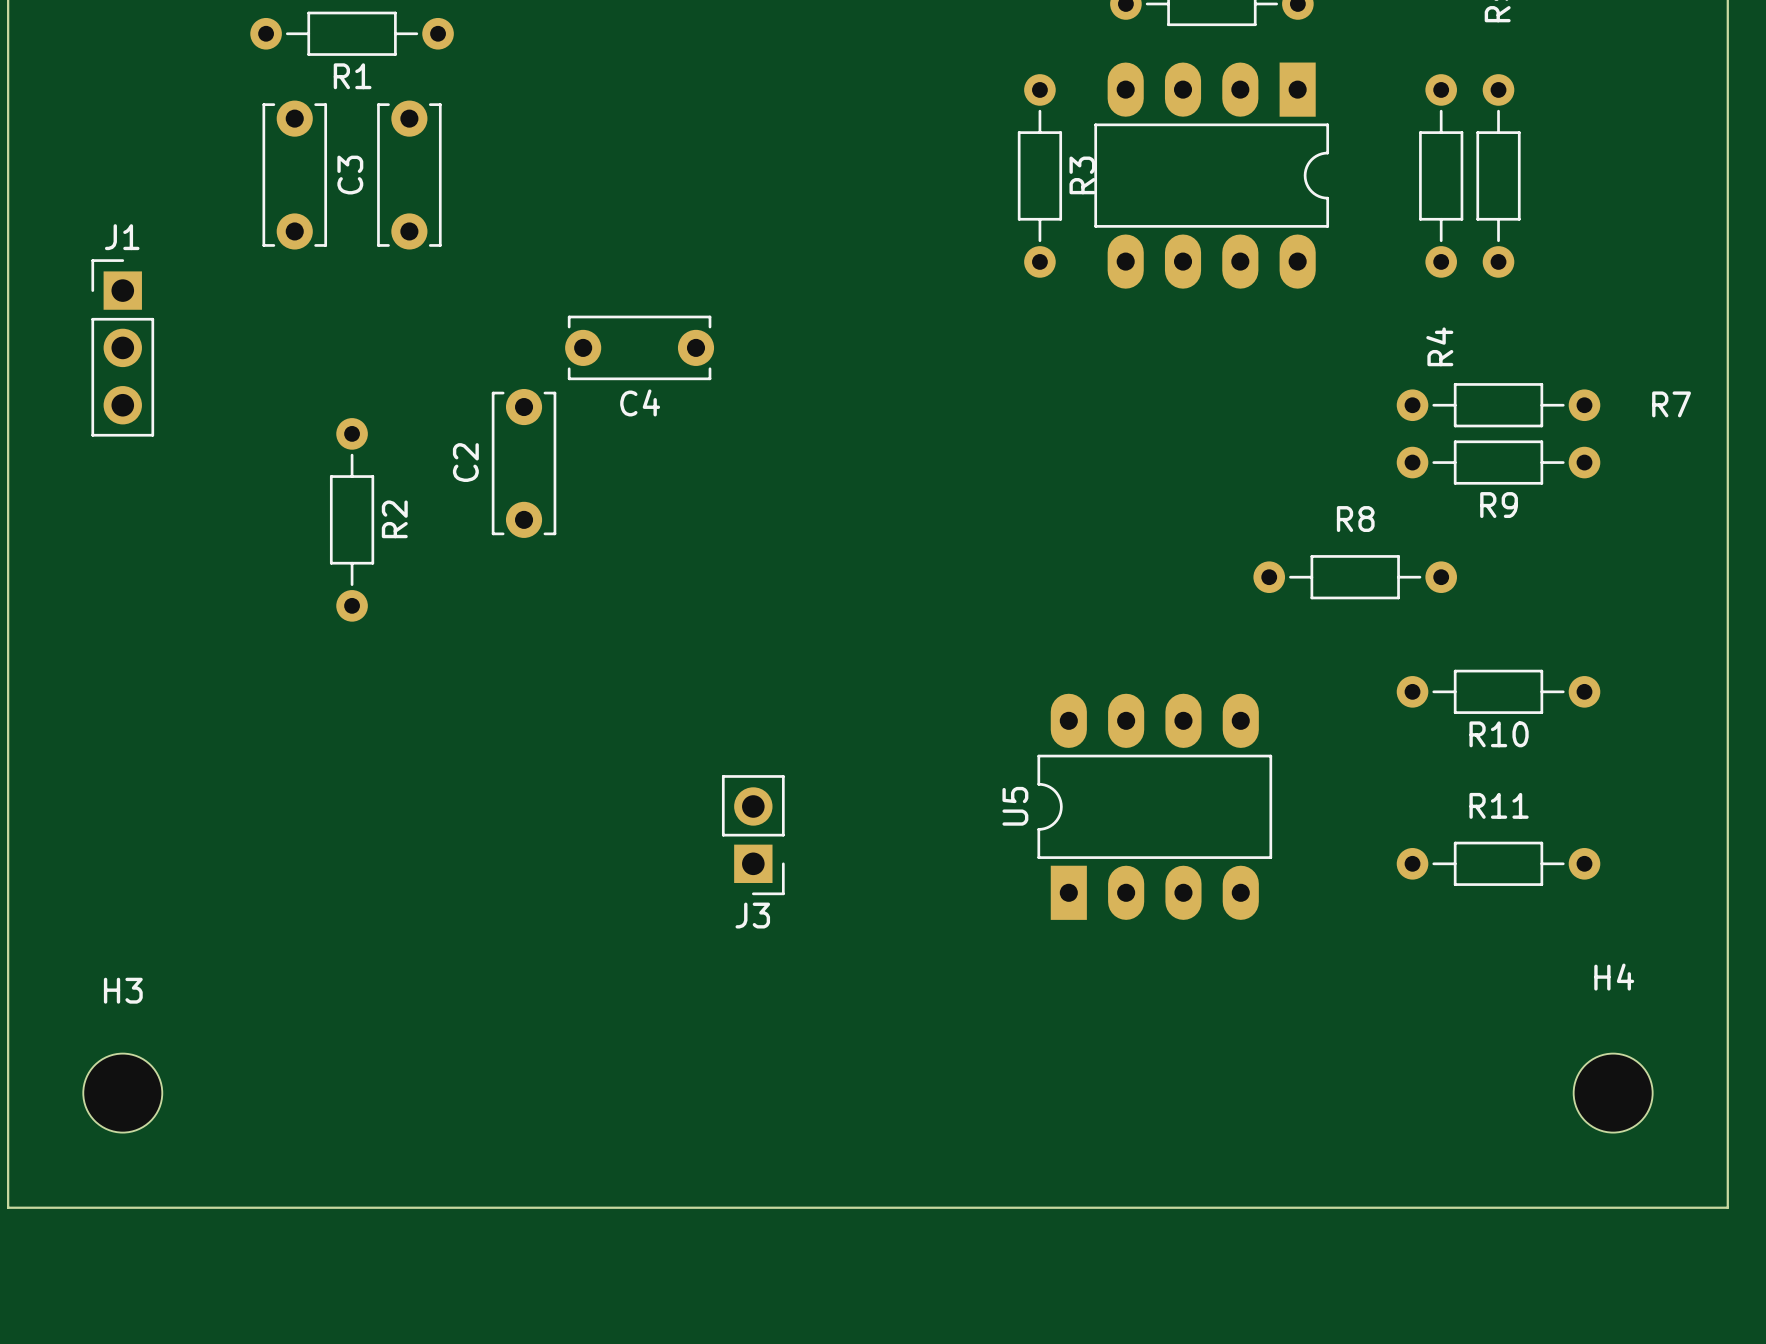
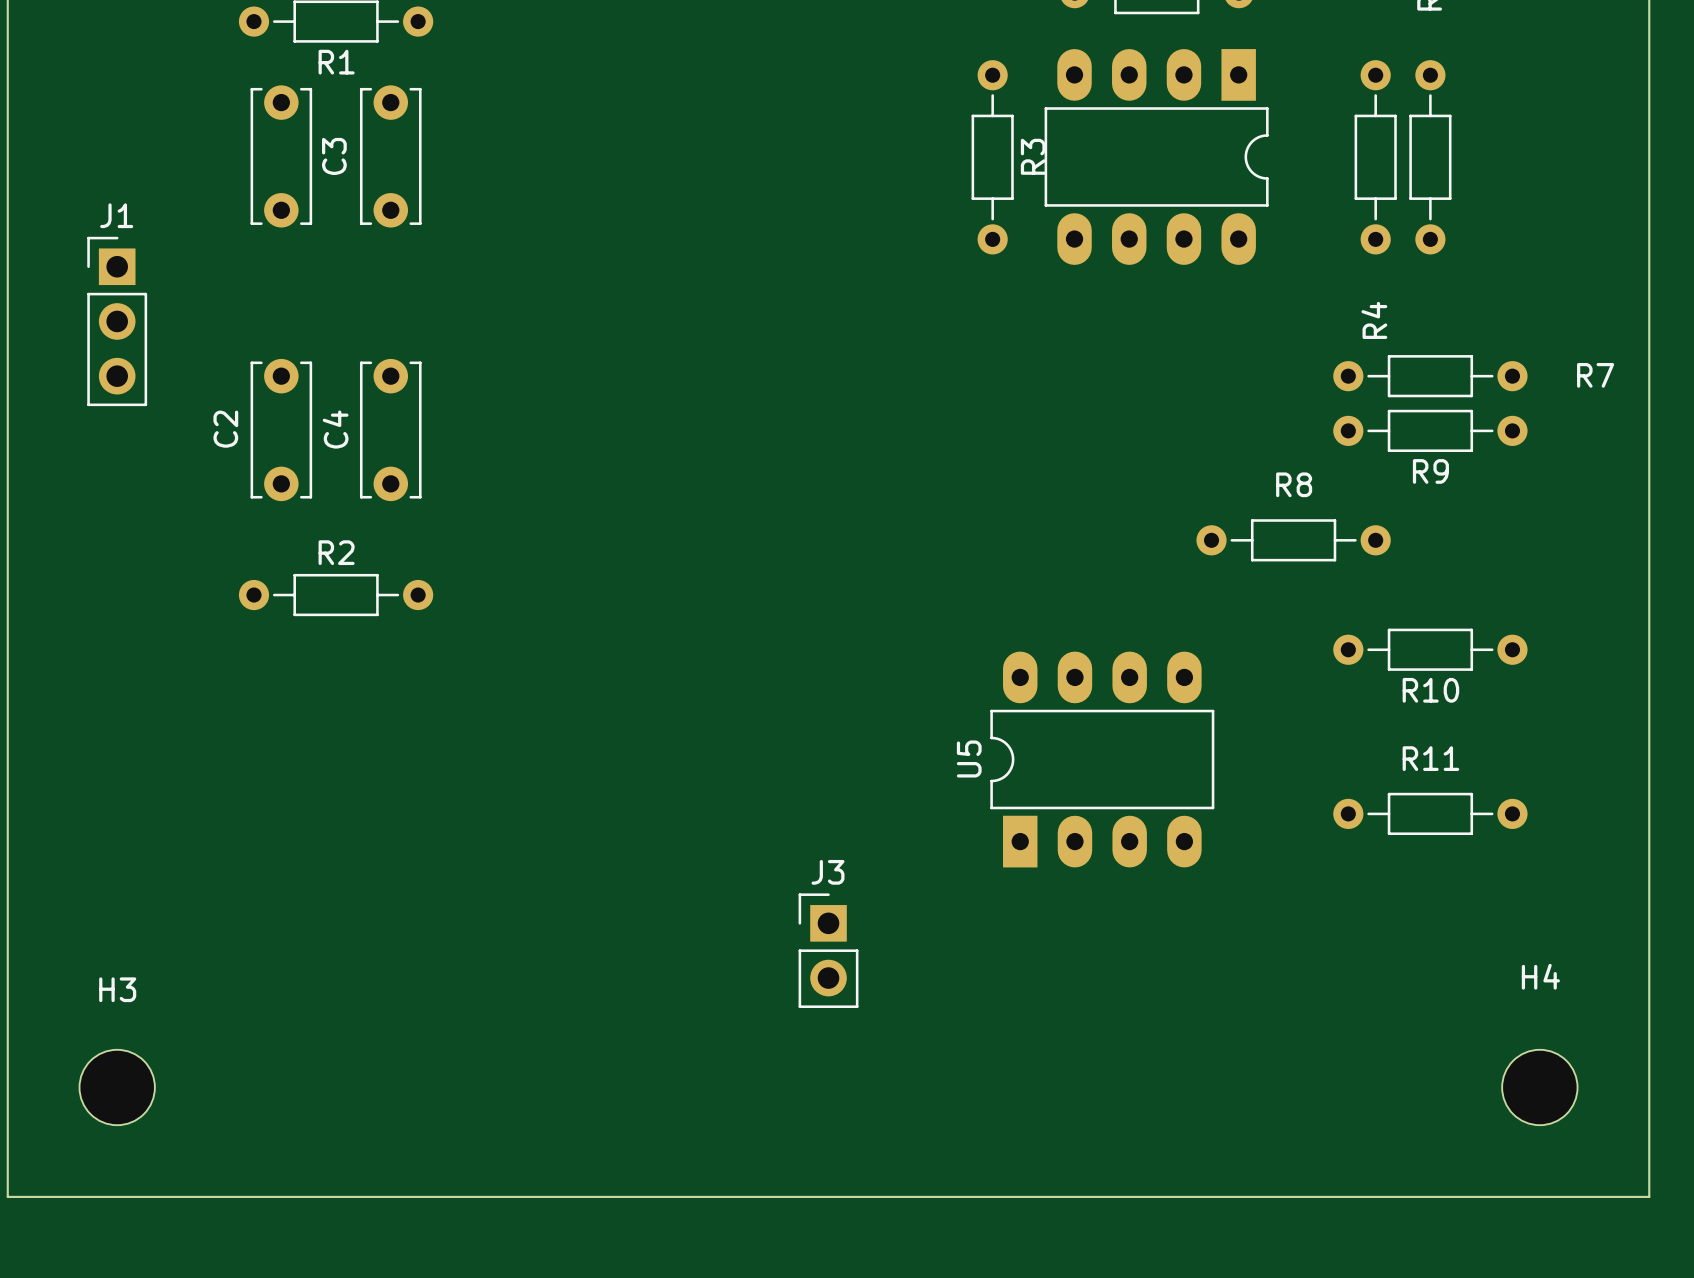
C4 rotation: 0° (639, 347) -> 90° clockwise (390, 430)
C4 position: (639, 347) -> (390, 430)
C2 position: (524, 463) -> (281, 430)
R2 rotation: 0° (352, 519) -> 90° clockwise (336, 595)
R2 name position: R2 (394, 519) -> R2 (336, 552)
J3 rotation: 0° (753, 835) -> 180° (828, 950)
J3 position: (753, 835) -> (828, 950)
H3 position: (122, 1093) -> (117, 1087)
H4 position: (1613, 1093) -> (1539, 1087)
board edge: (8, 1207) (1727, 1207) -> (7, 1142) (7, 1196) (1649, 1196) (1649, 1142)

